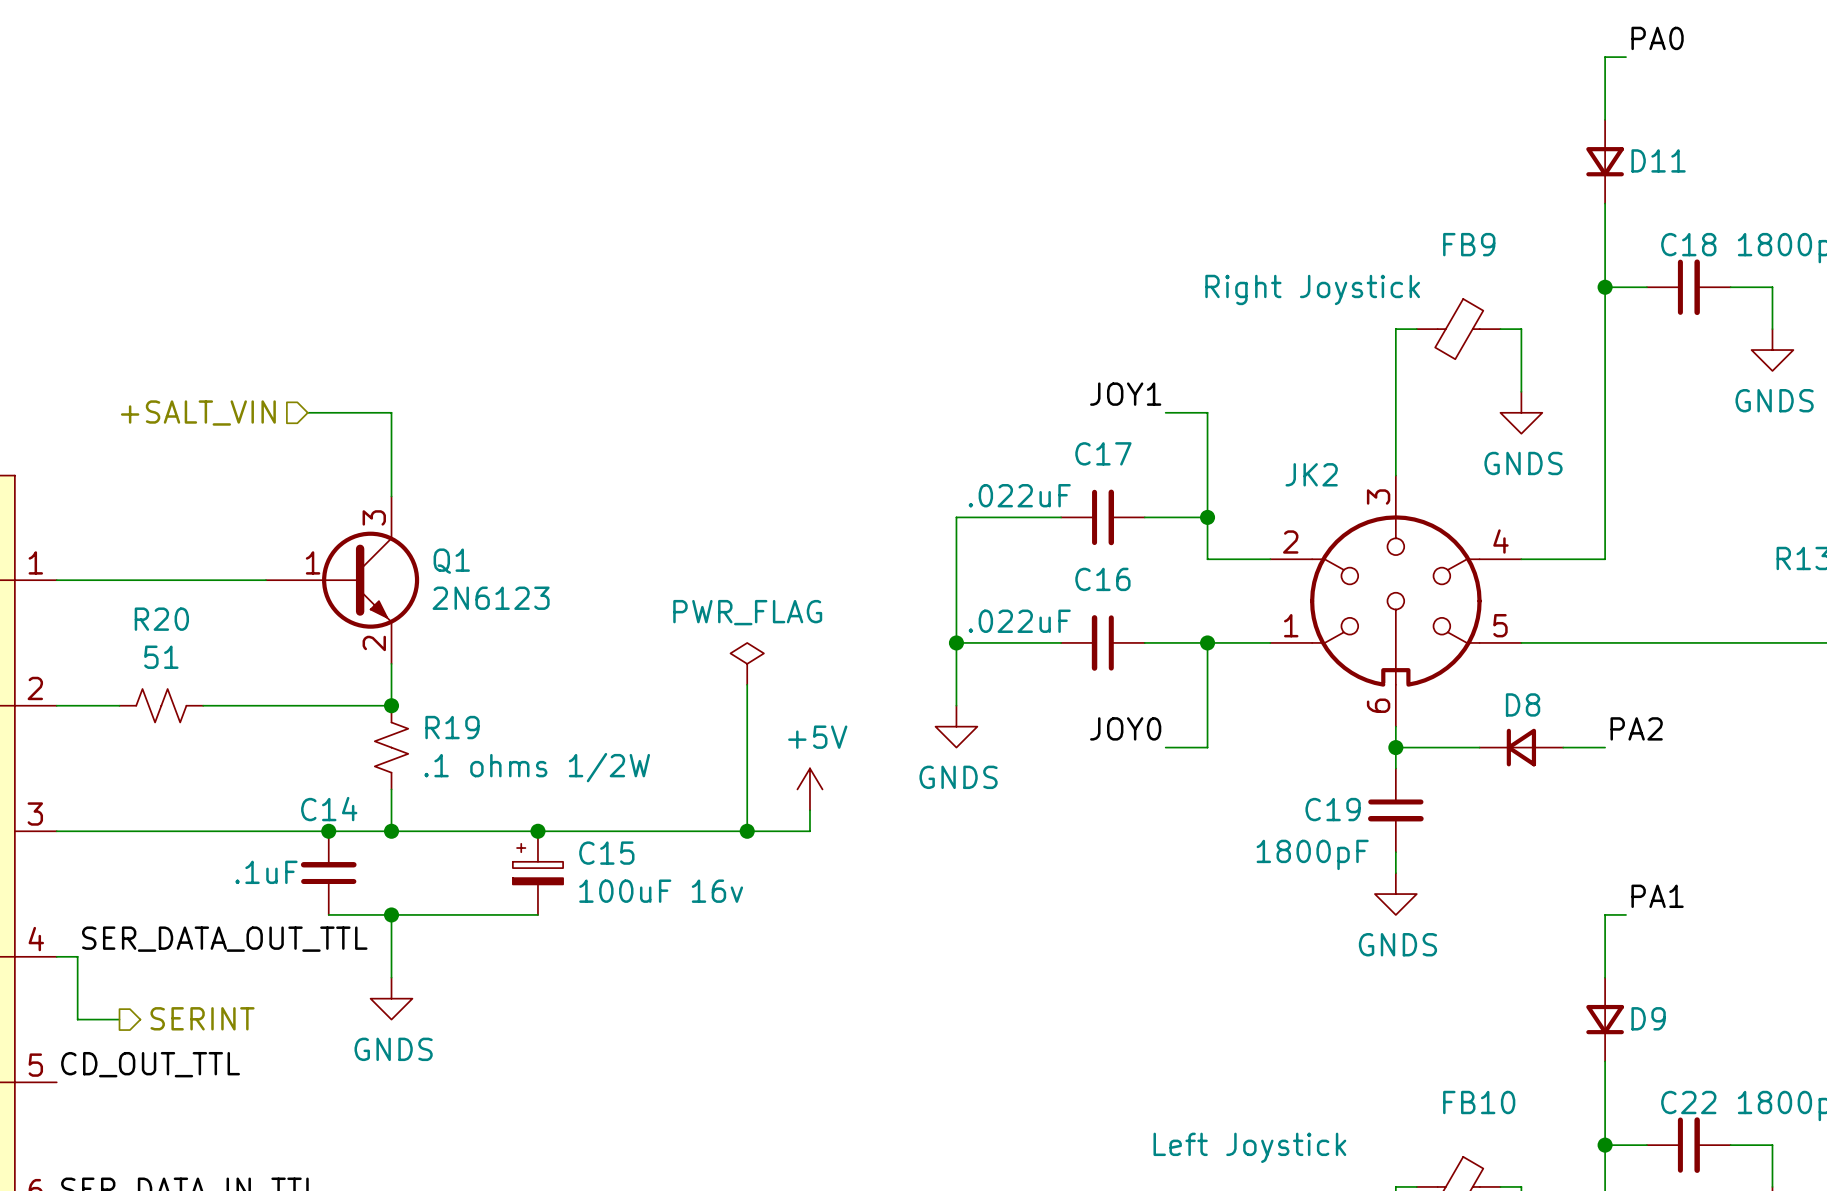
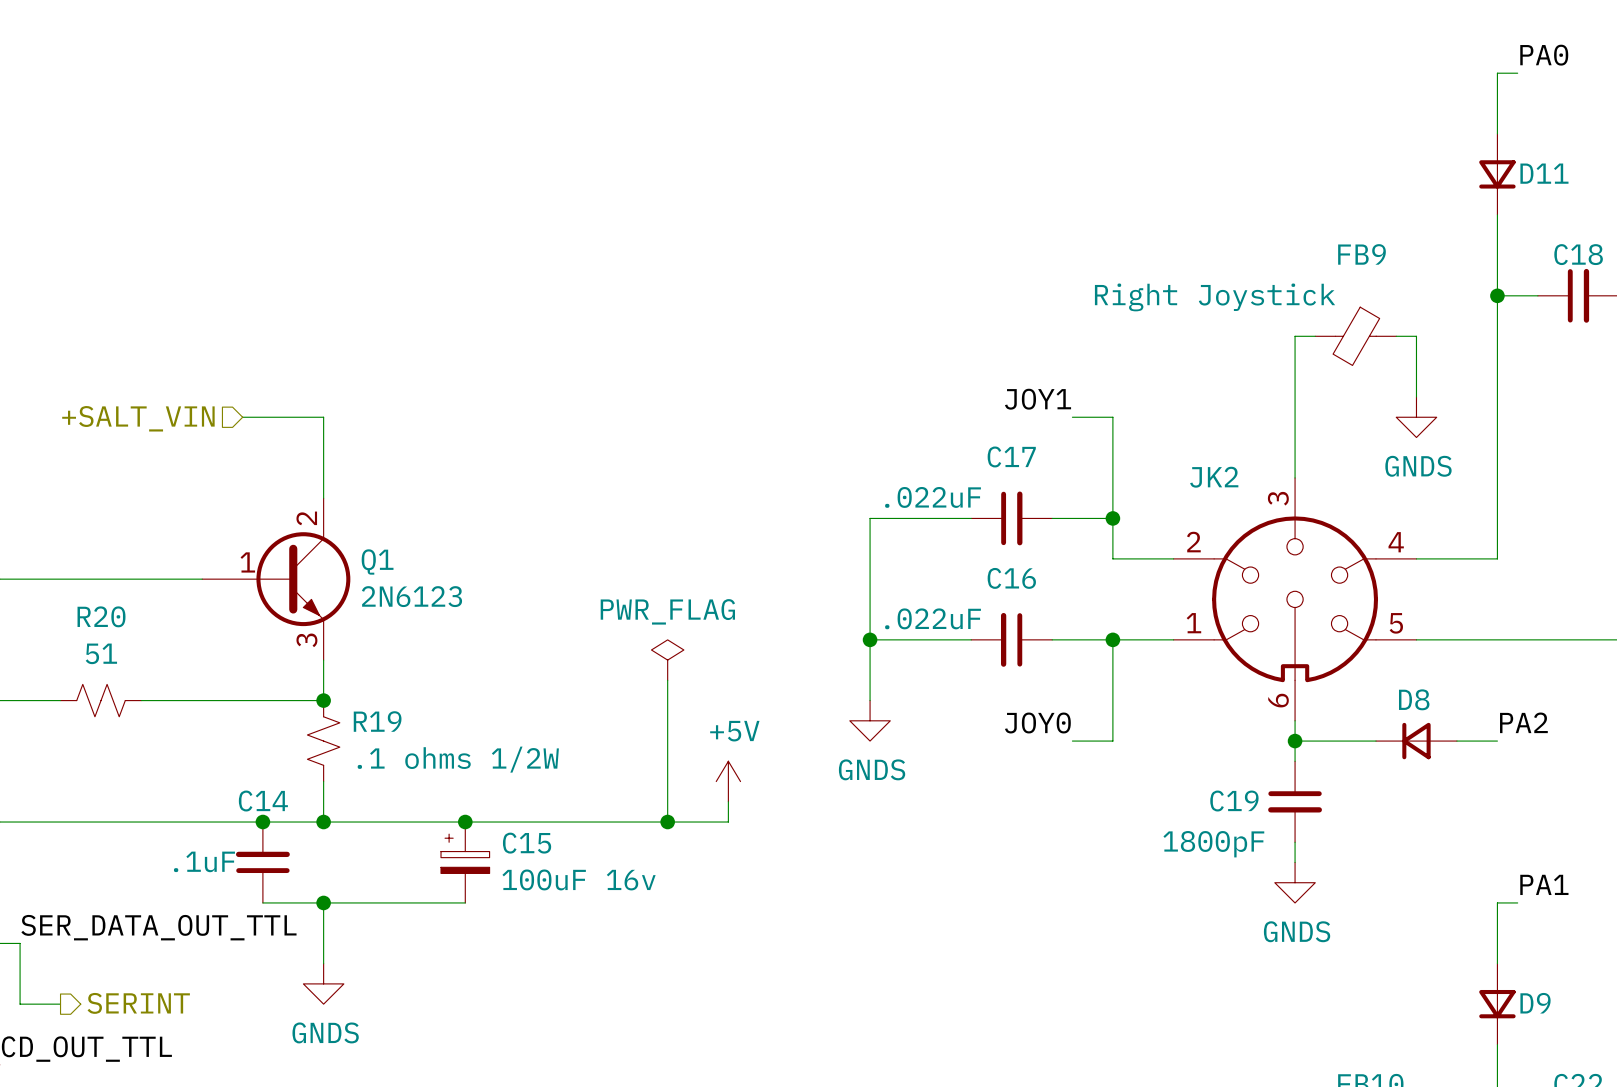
Q1 pin number: 3 (374, 517) -> 2 (306, 518)
Q1 pin number: 2 (374, 643) -> 3 (306, 640)

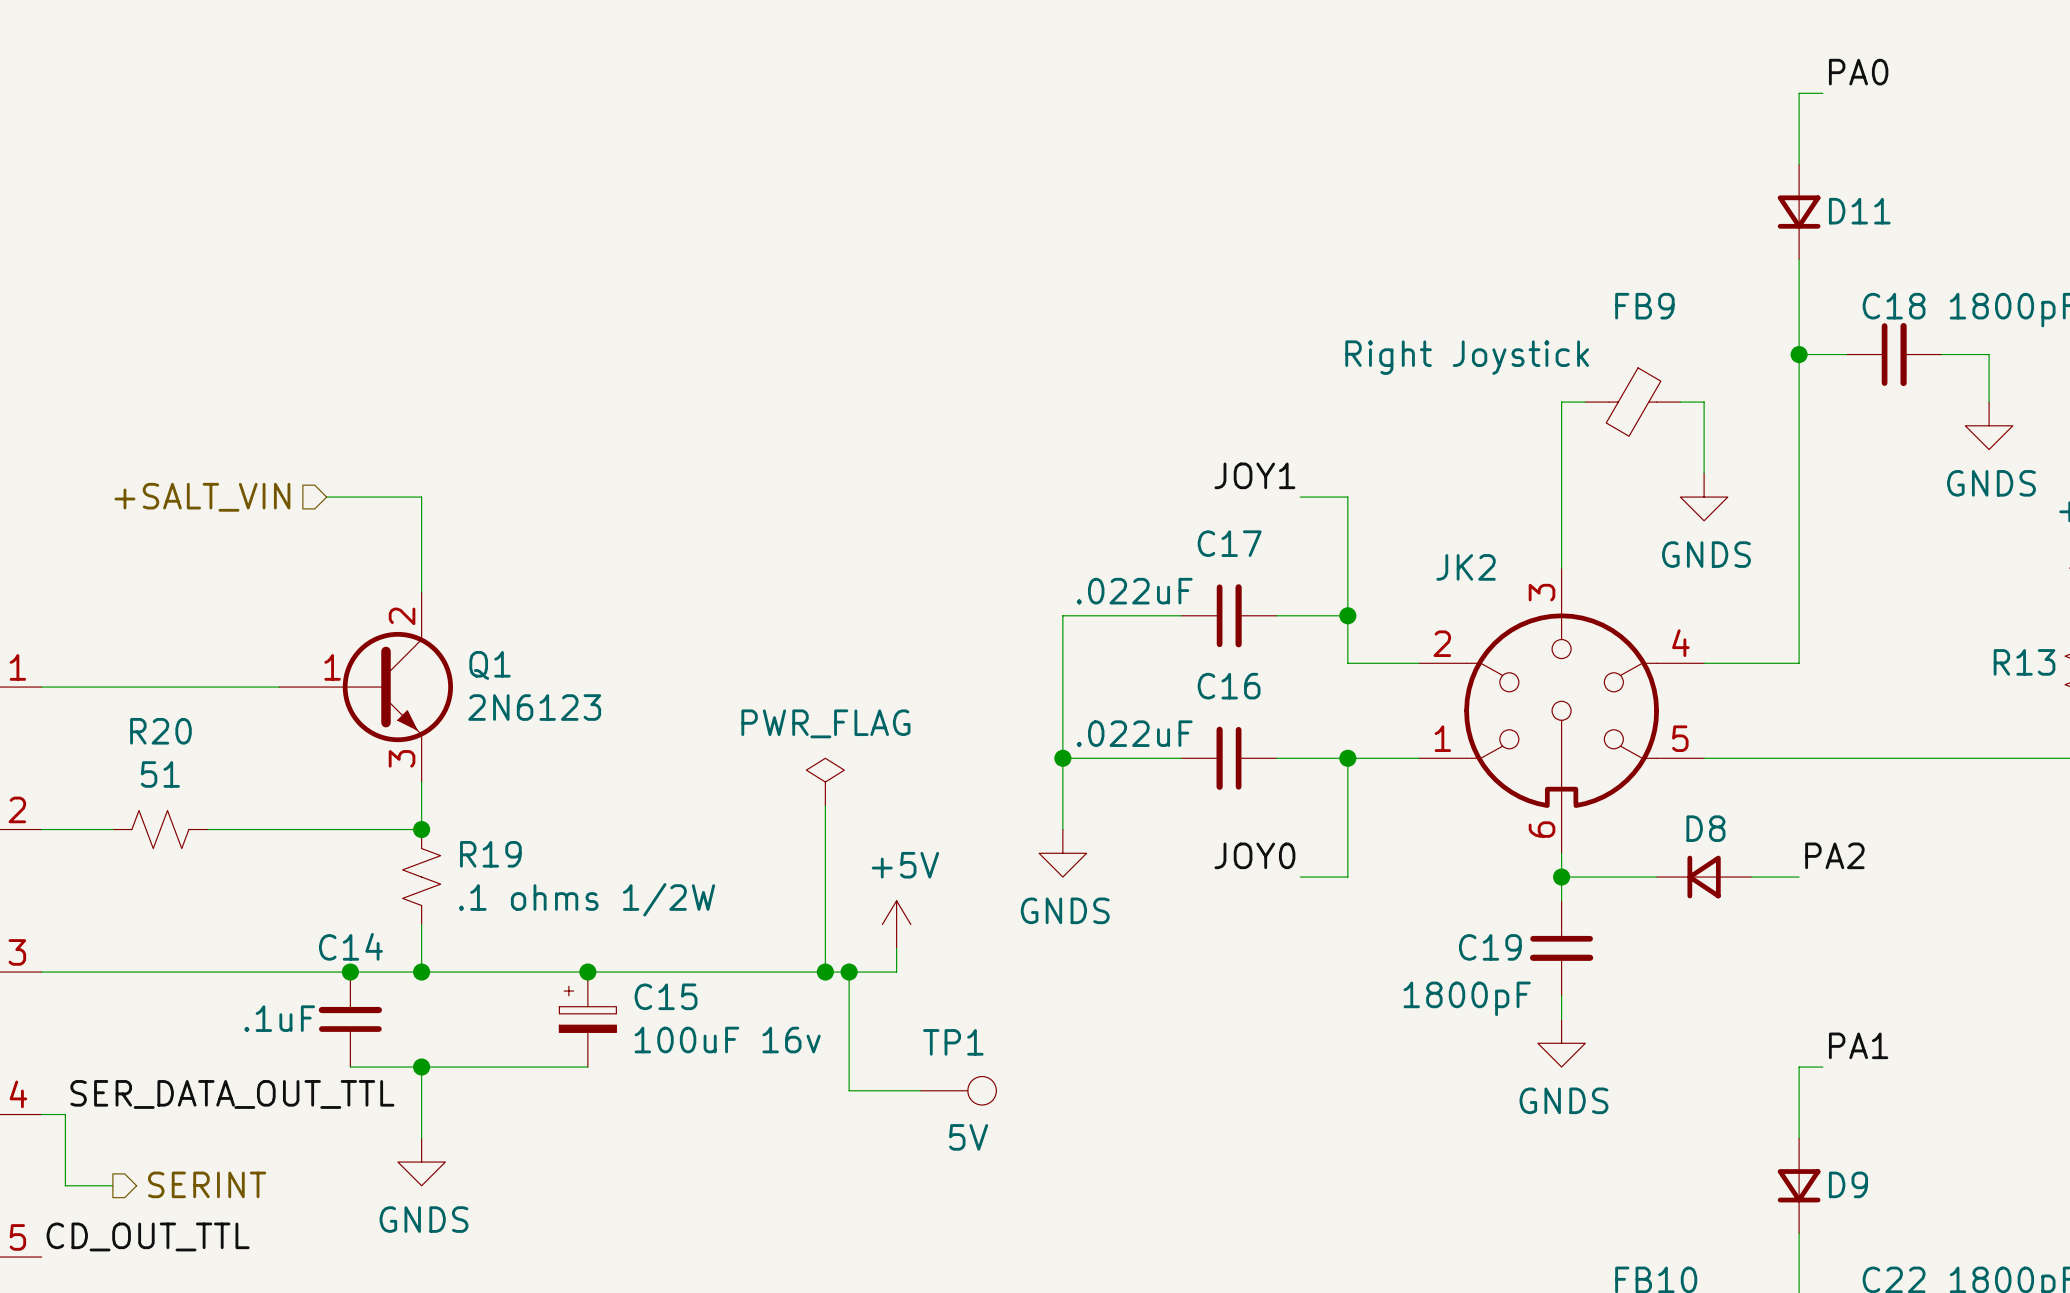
wire: none -> (849, 972) (849, 1090) (920, 1090)
junction: none -> (849, 972)
TP1: none -> 5V (958, 1090)

